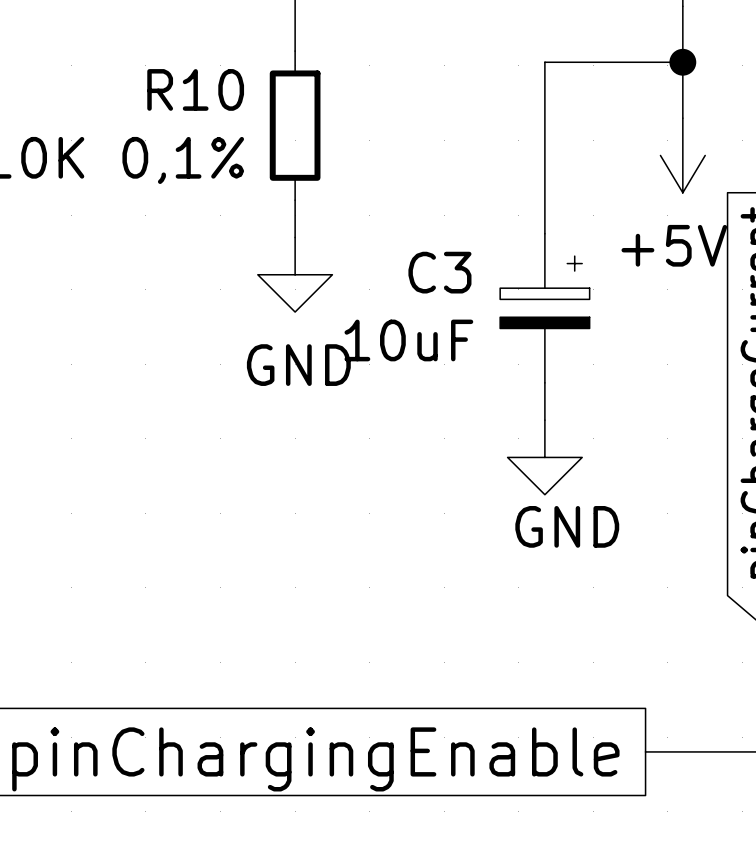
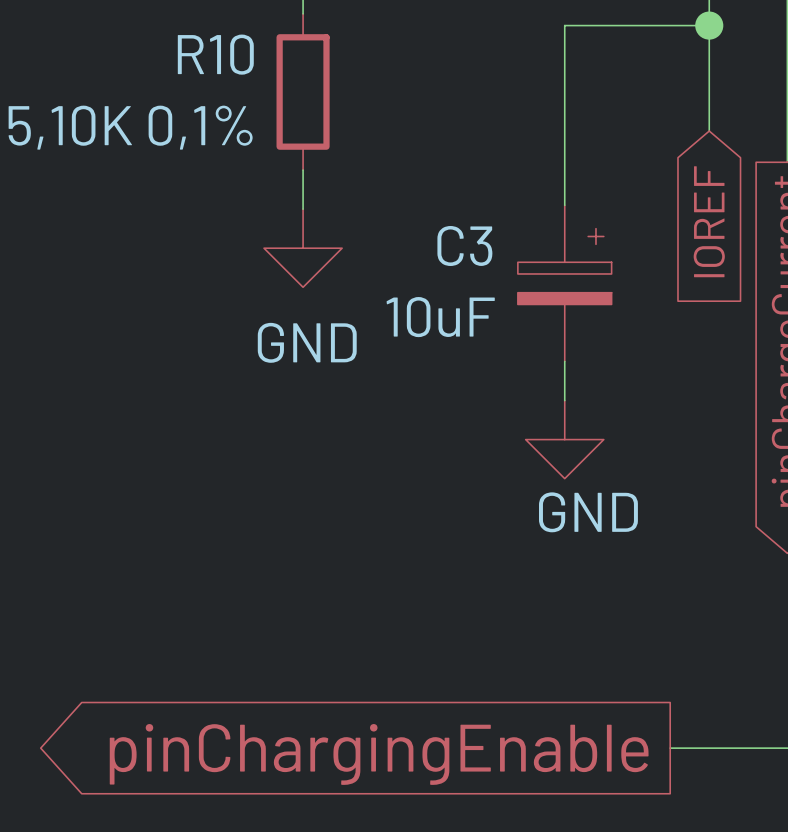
power symbol: +5V (682, 155) -> none
global label: none -> IOREF (709, 221)

